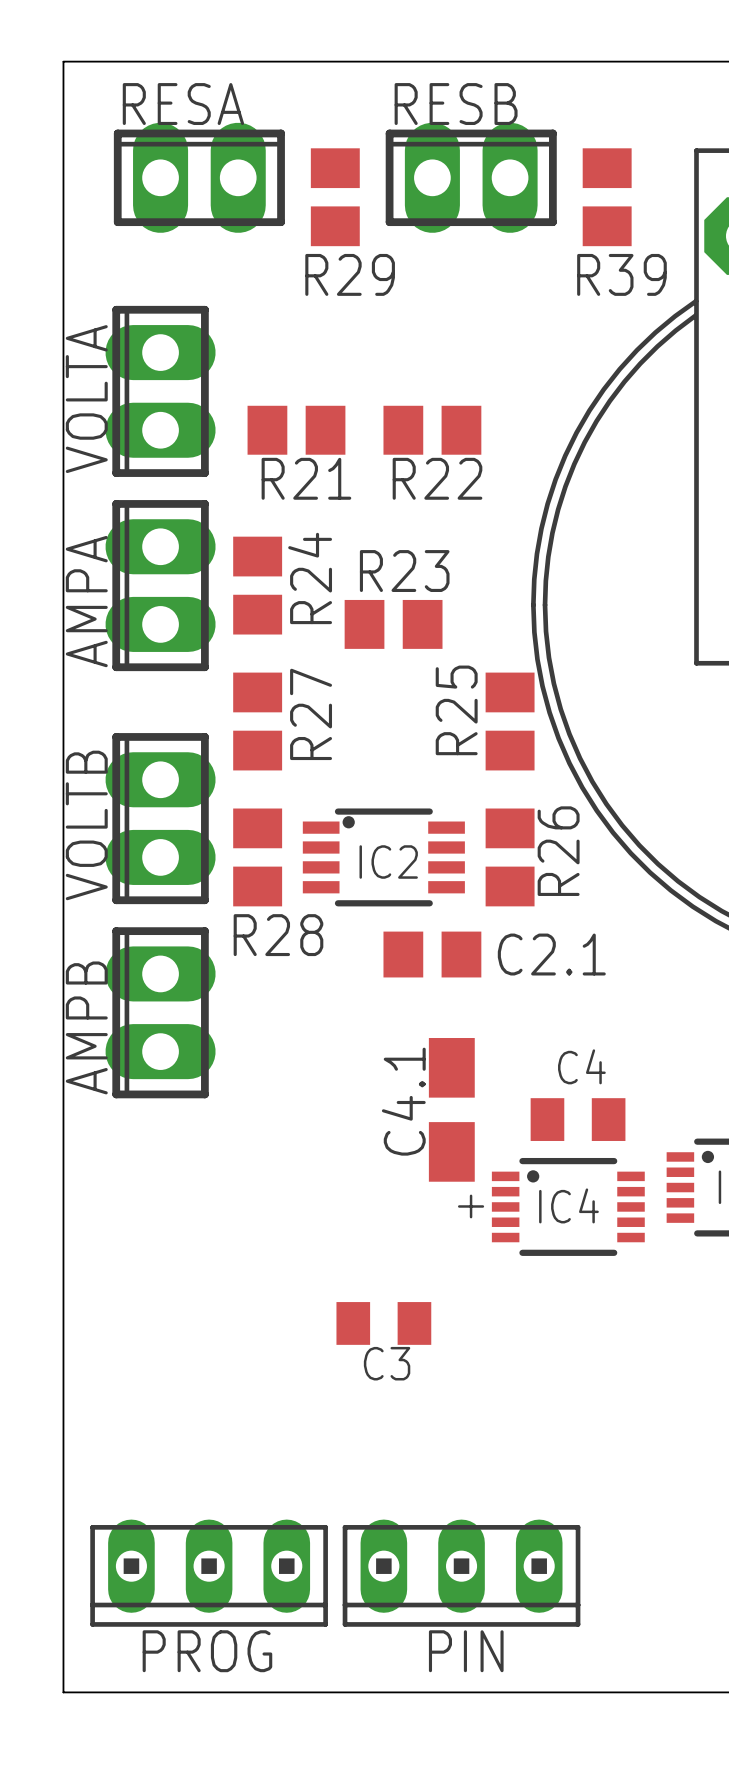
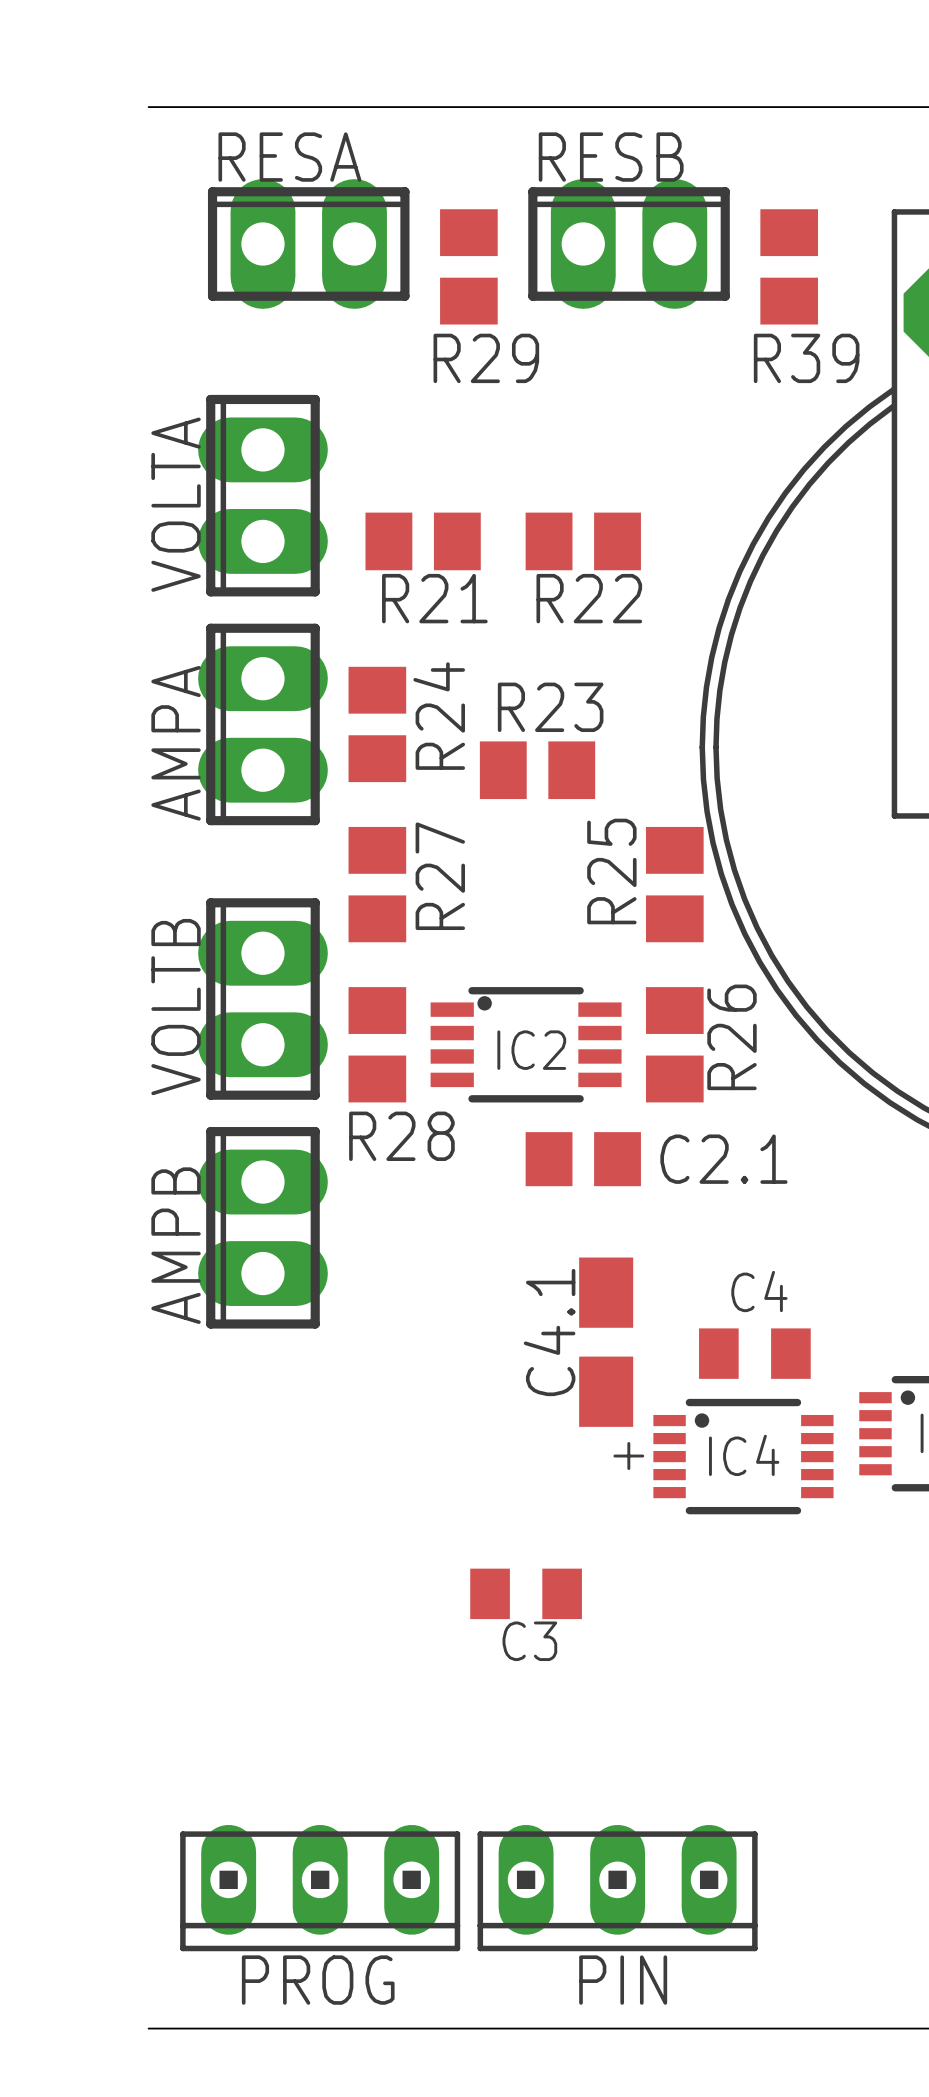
board edge: (63, 61) (63, 1692) -> none

